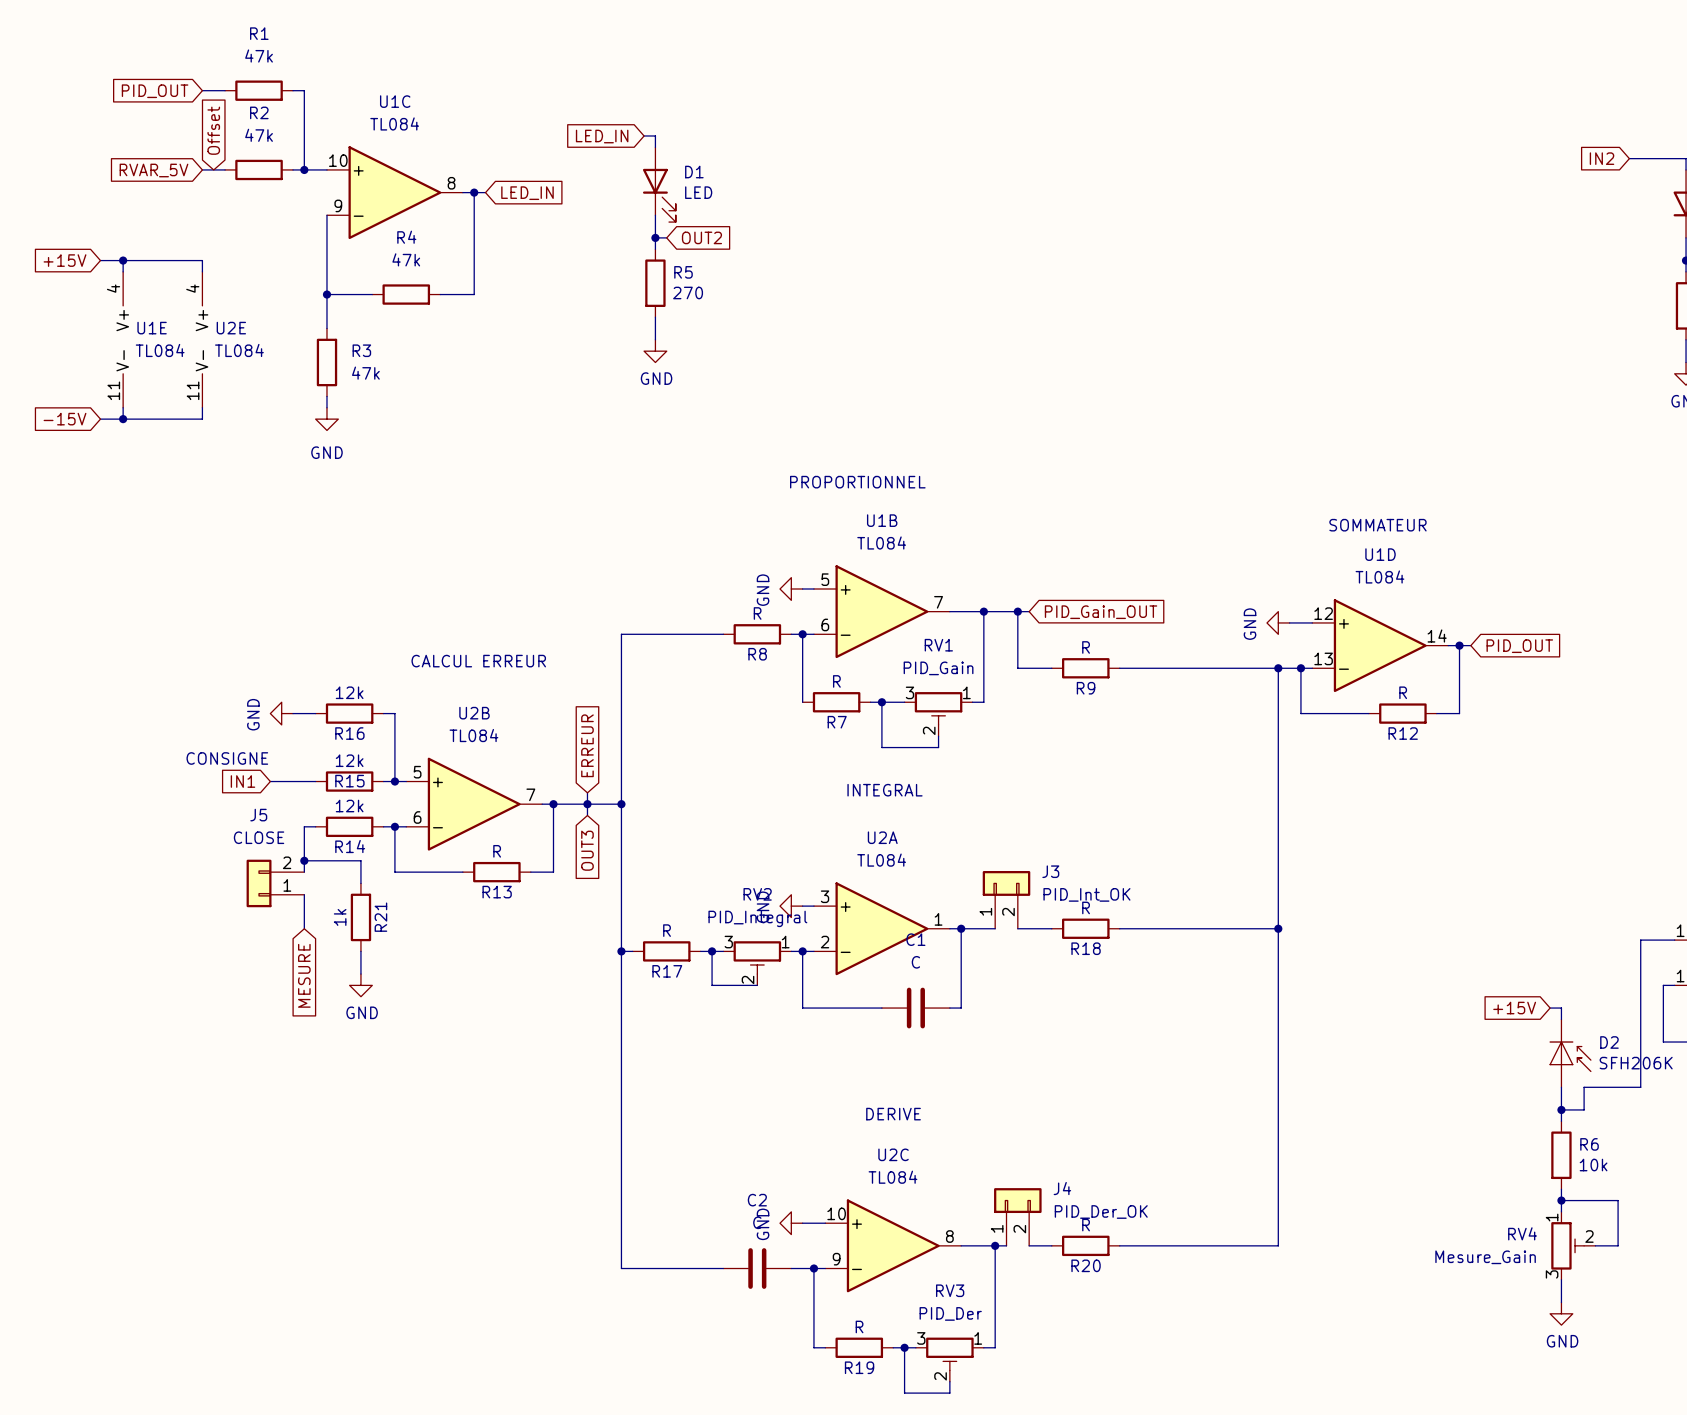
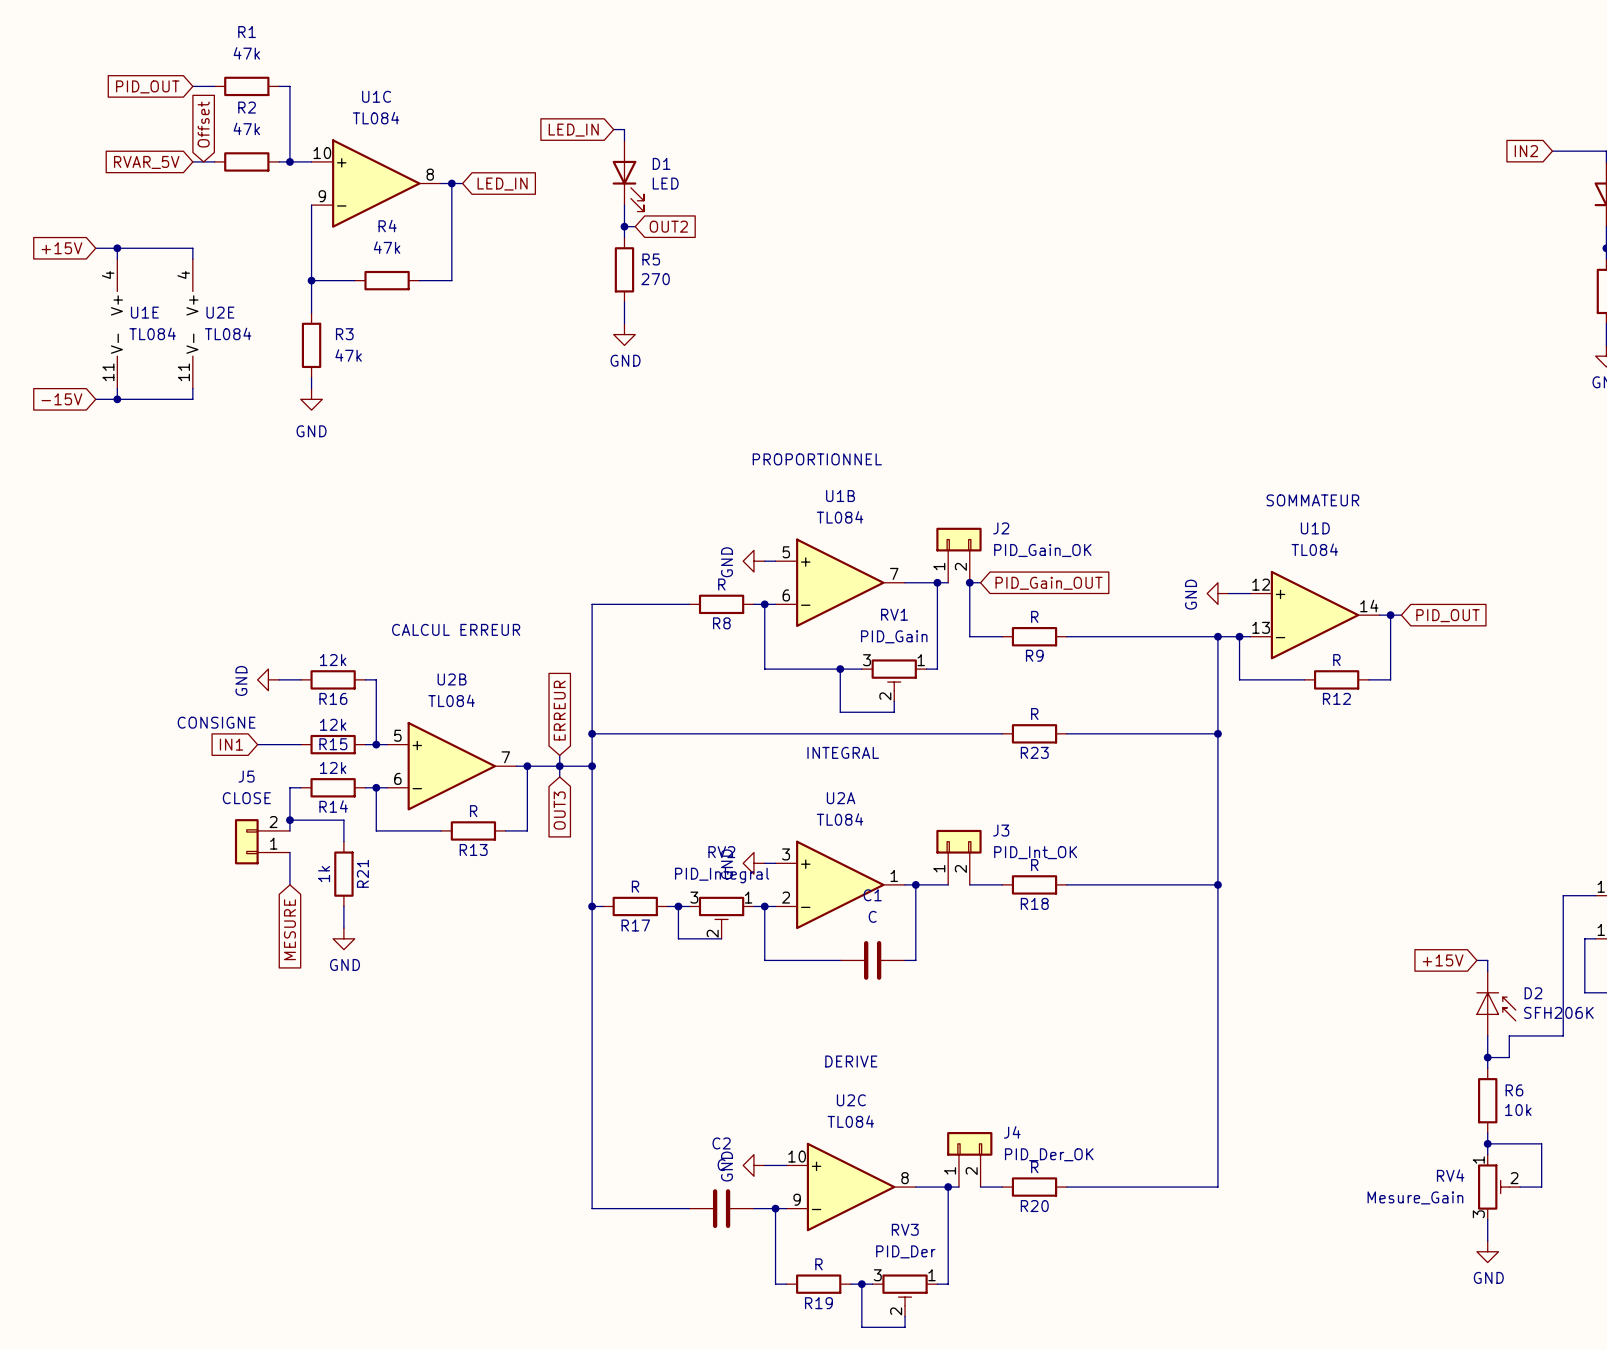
J2: none -> PID_Gain_OK (958, 555)
wire: (995, 611) (1017, 611) -> none
wire: none -> (764, 669) (829, 669)
R7: R (836, 702) -> none
wire: none -> (592, 733) (1002, 733)
junction: none -> (592, 733)
R23: none -> R (1034, 733)
wire: none -> (1066, 733) (1217, 733)
junction: none -> (1217, 733)

